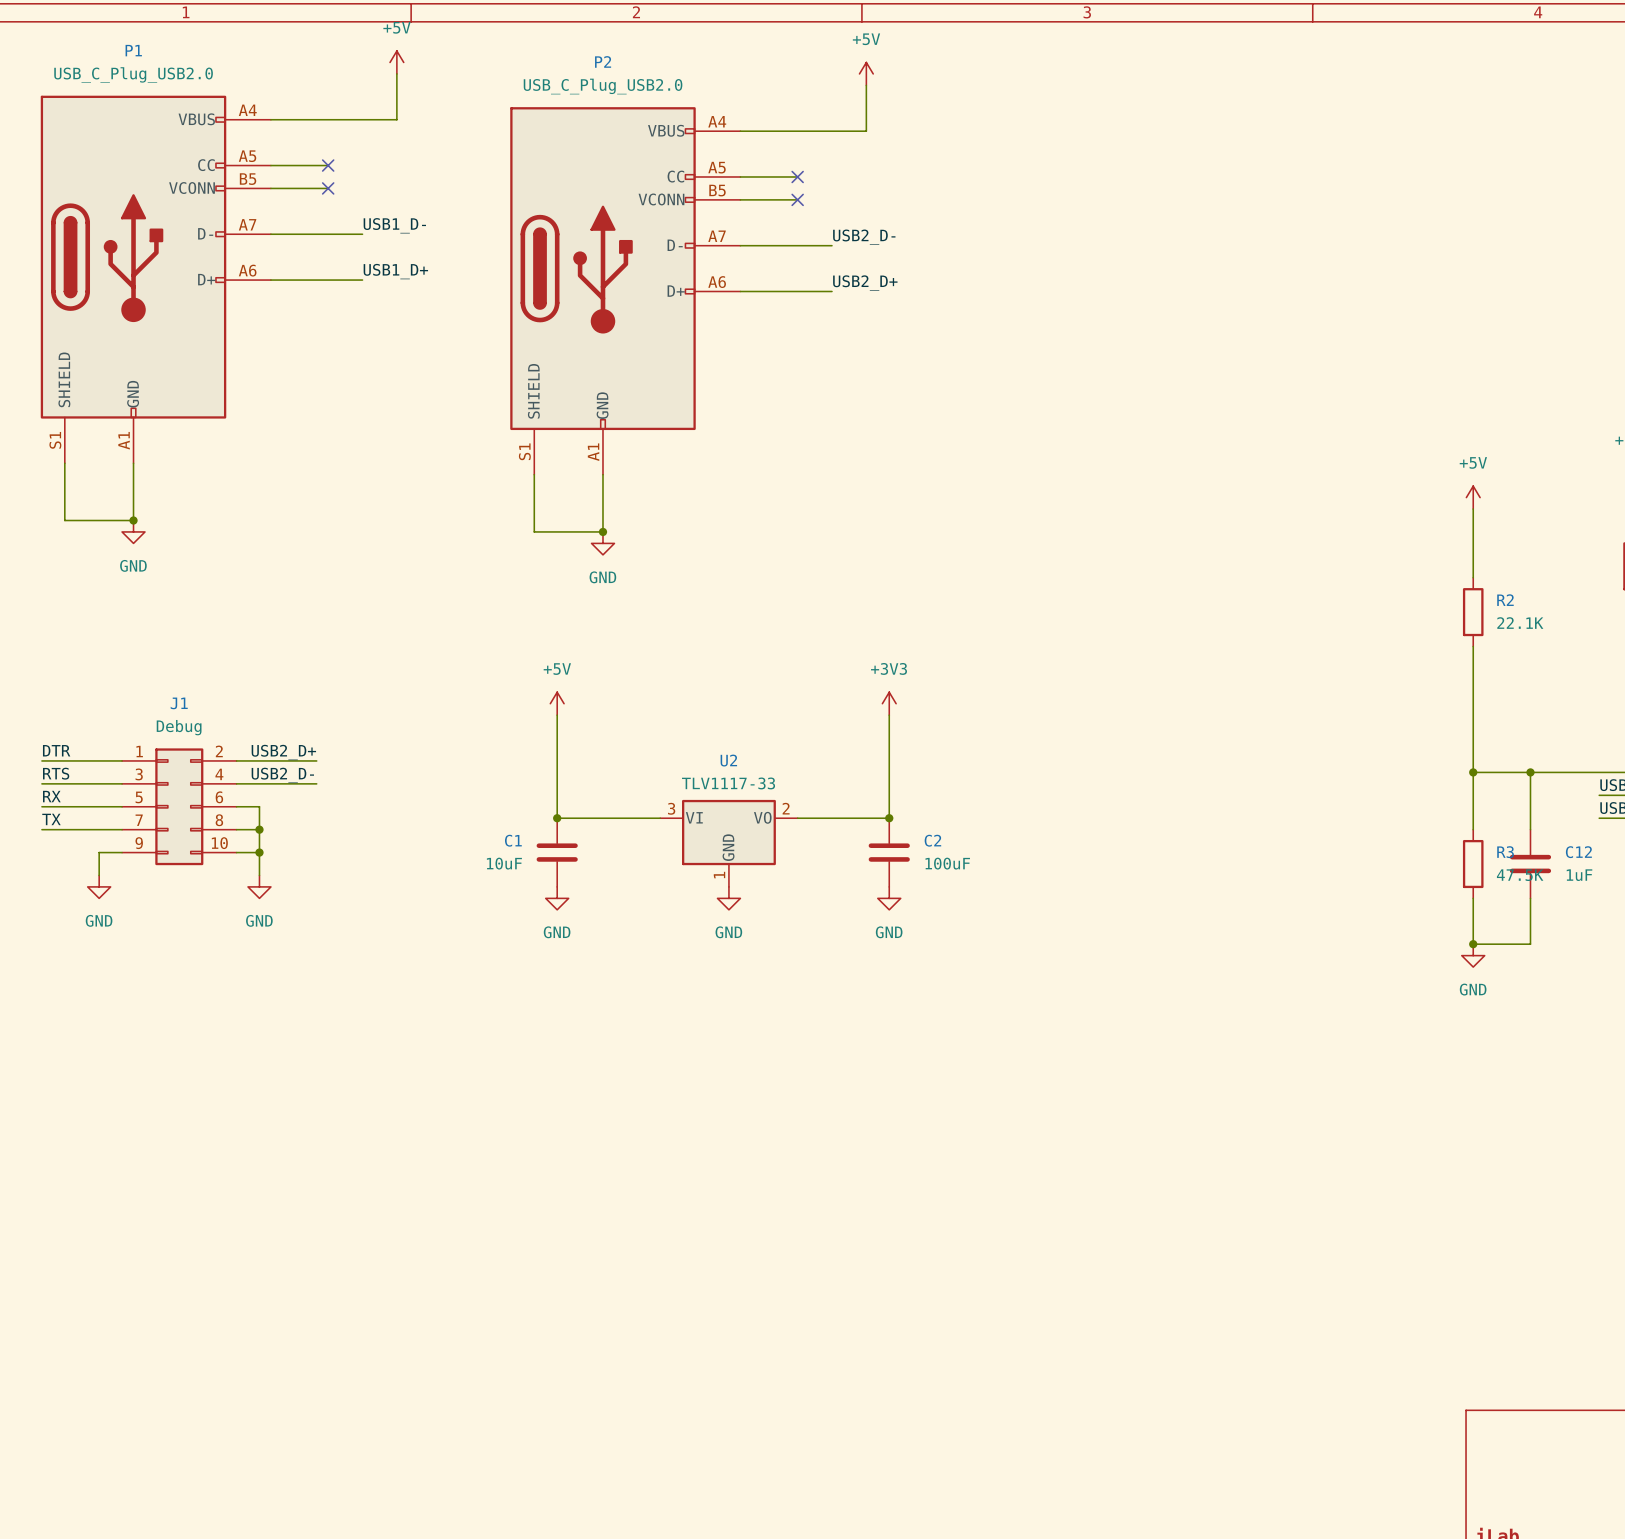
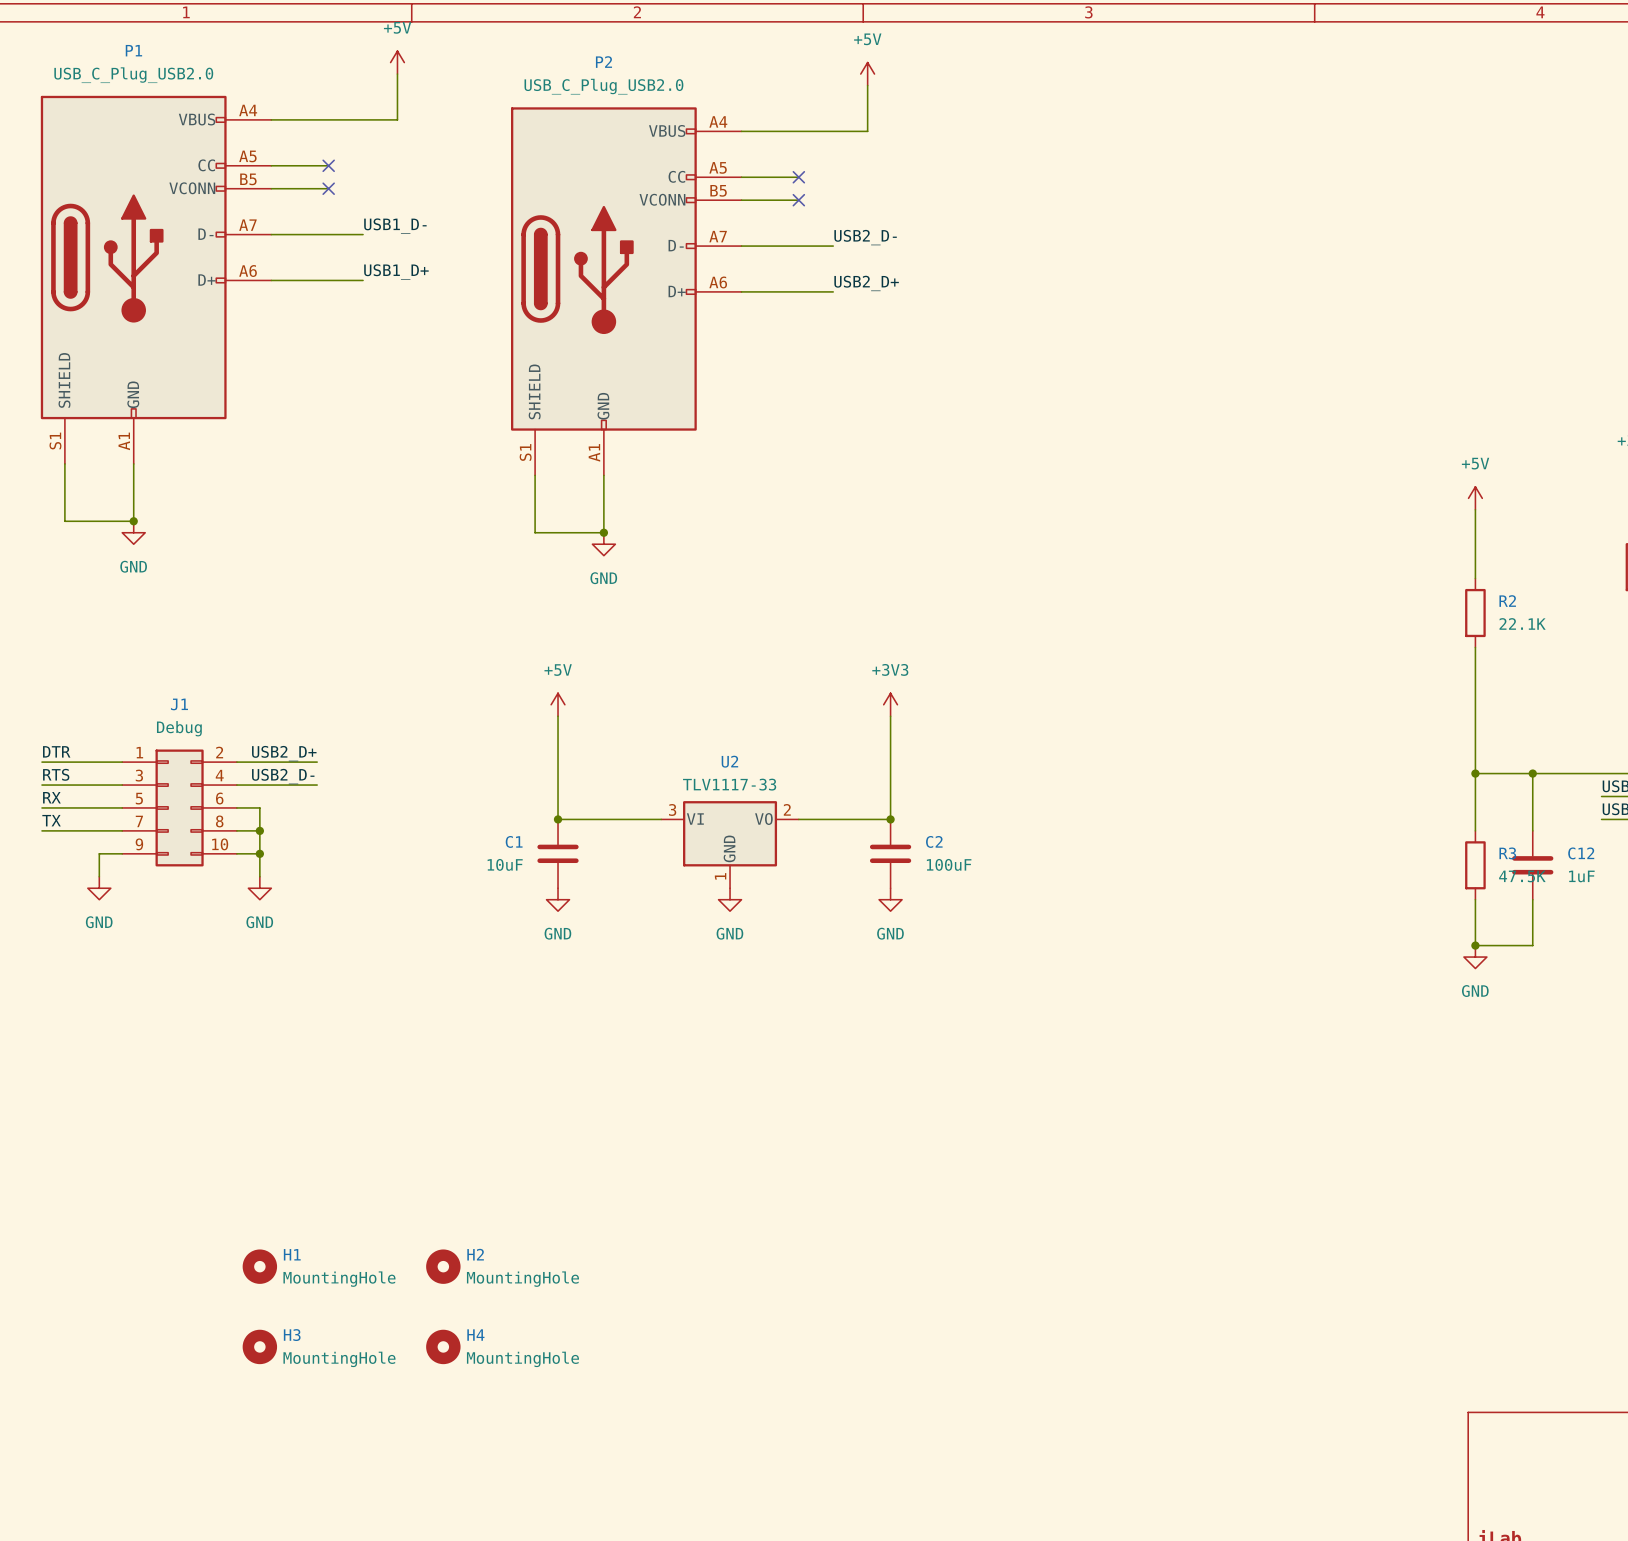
H1: none -> MountingHole (259, 1266)
H2: none -> MountingHole (443, 1266)
H3: none -> MountingHole (259, 1346)
H4: none -> MountingHole (443, 1346)

